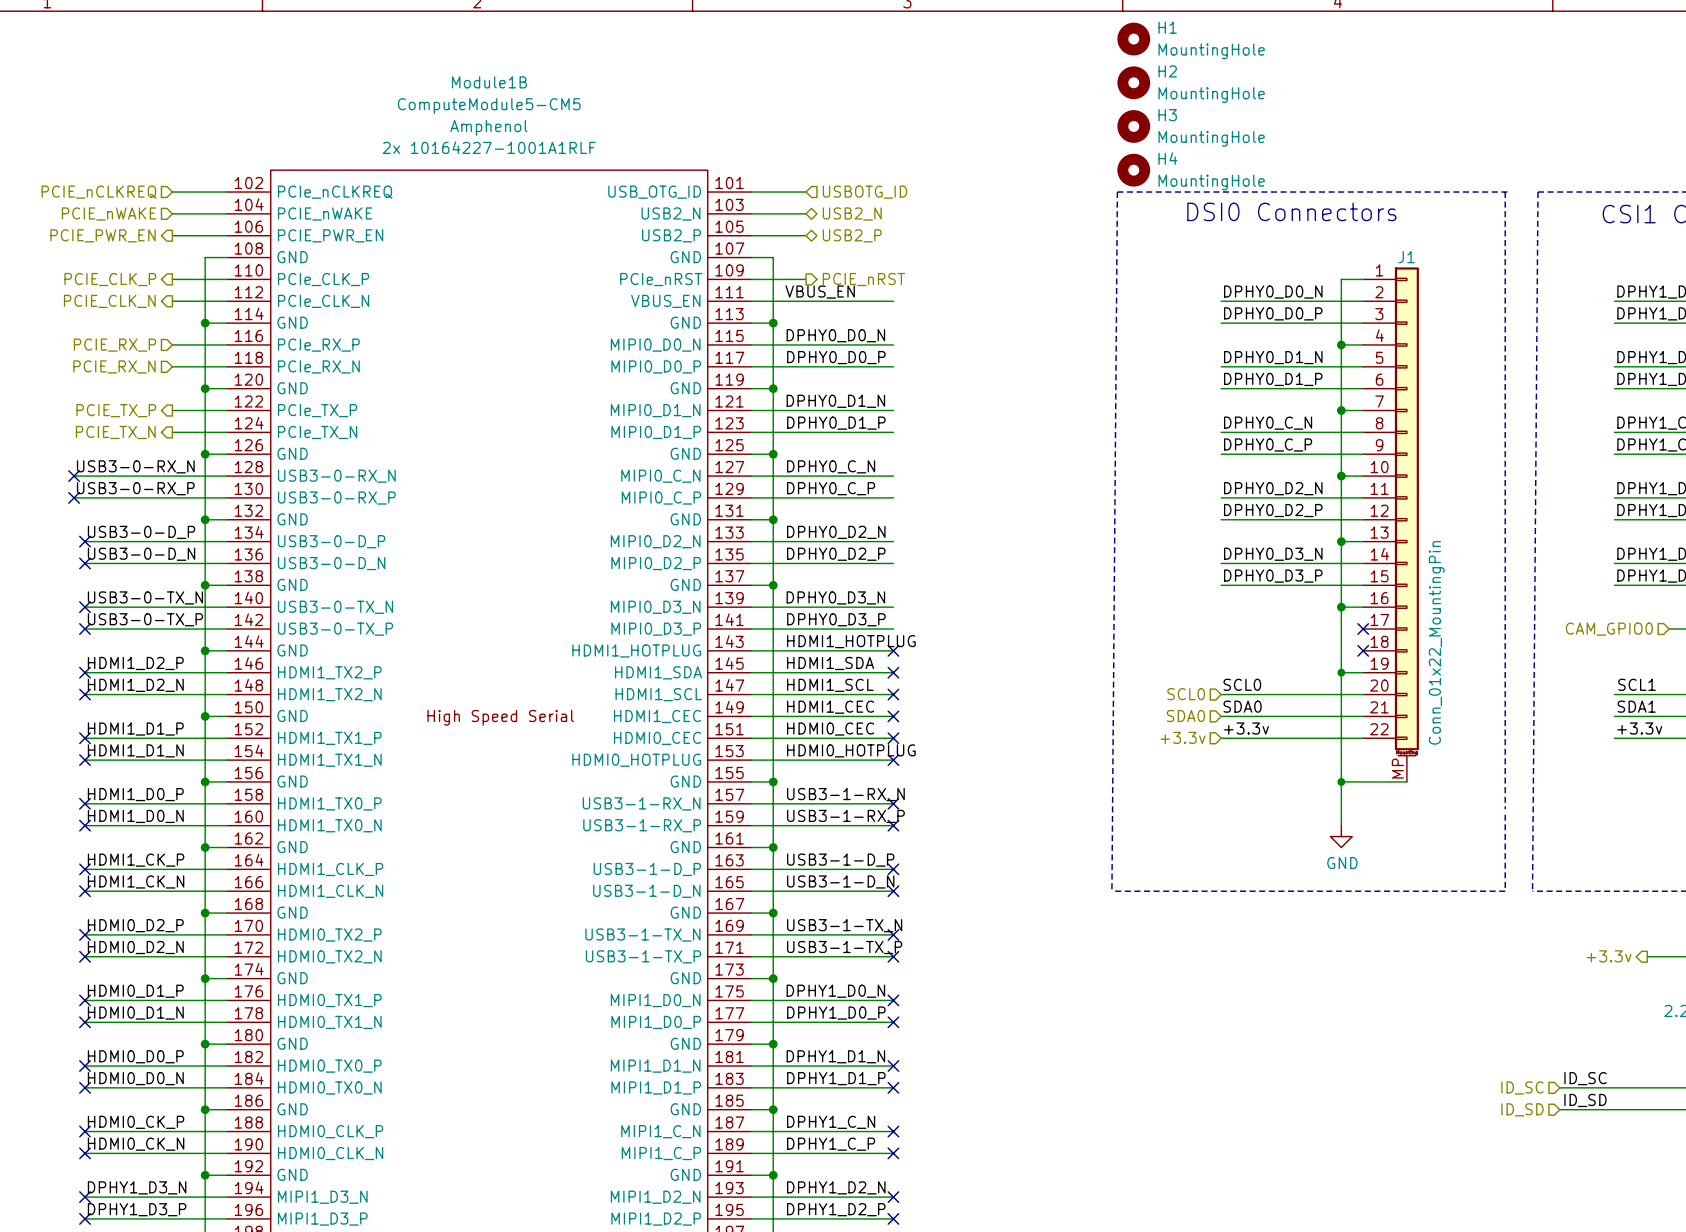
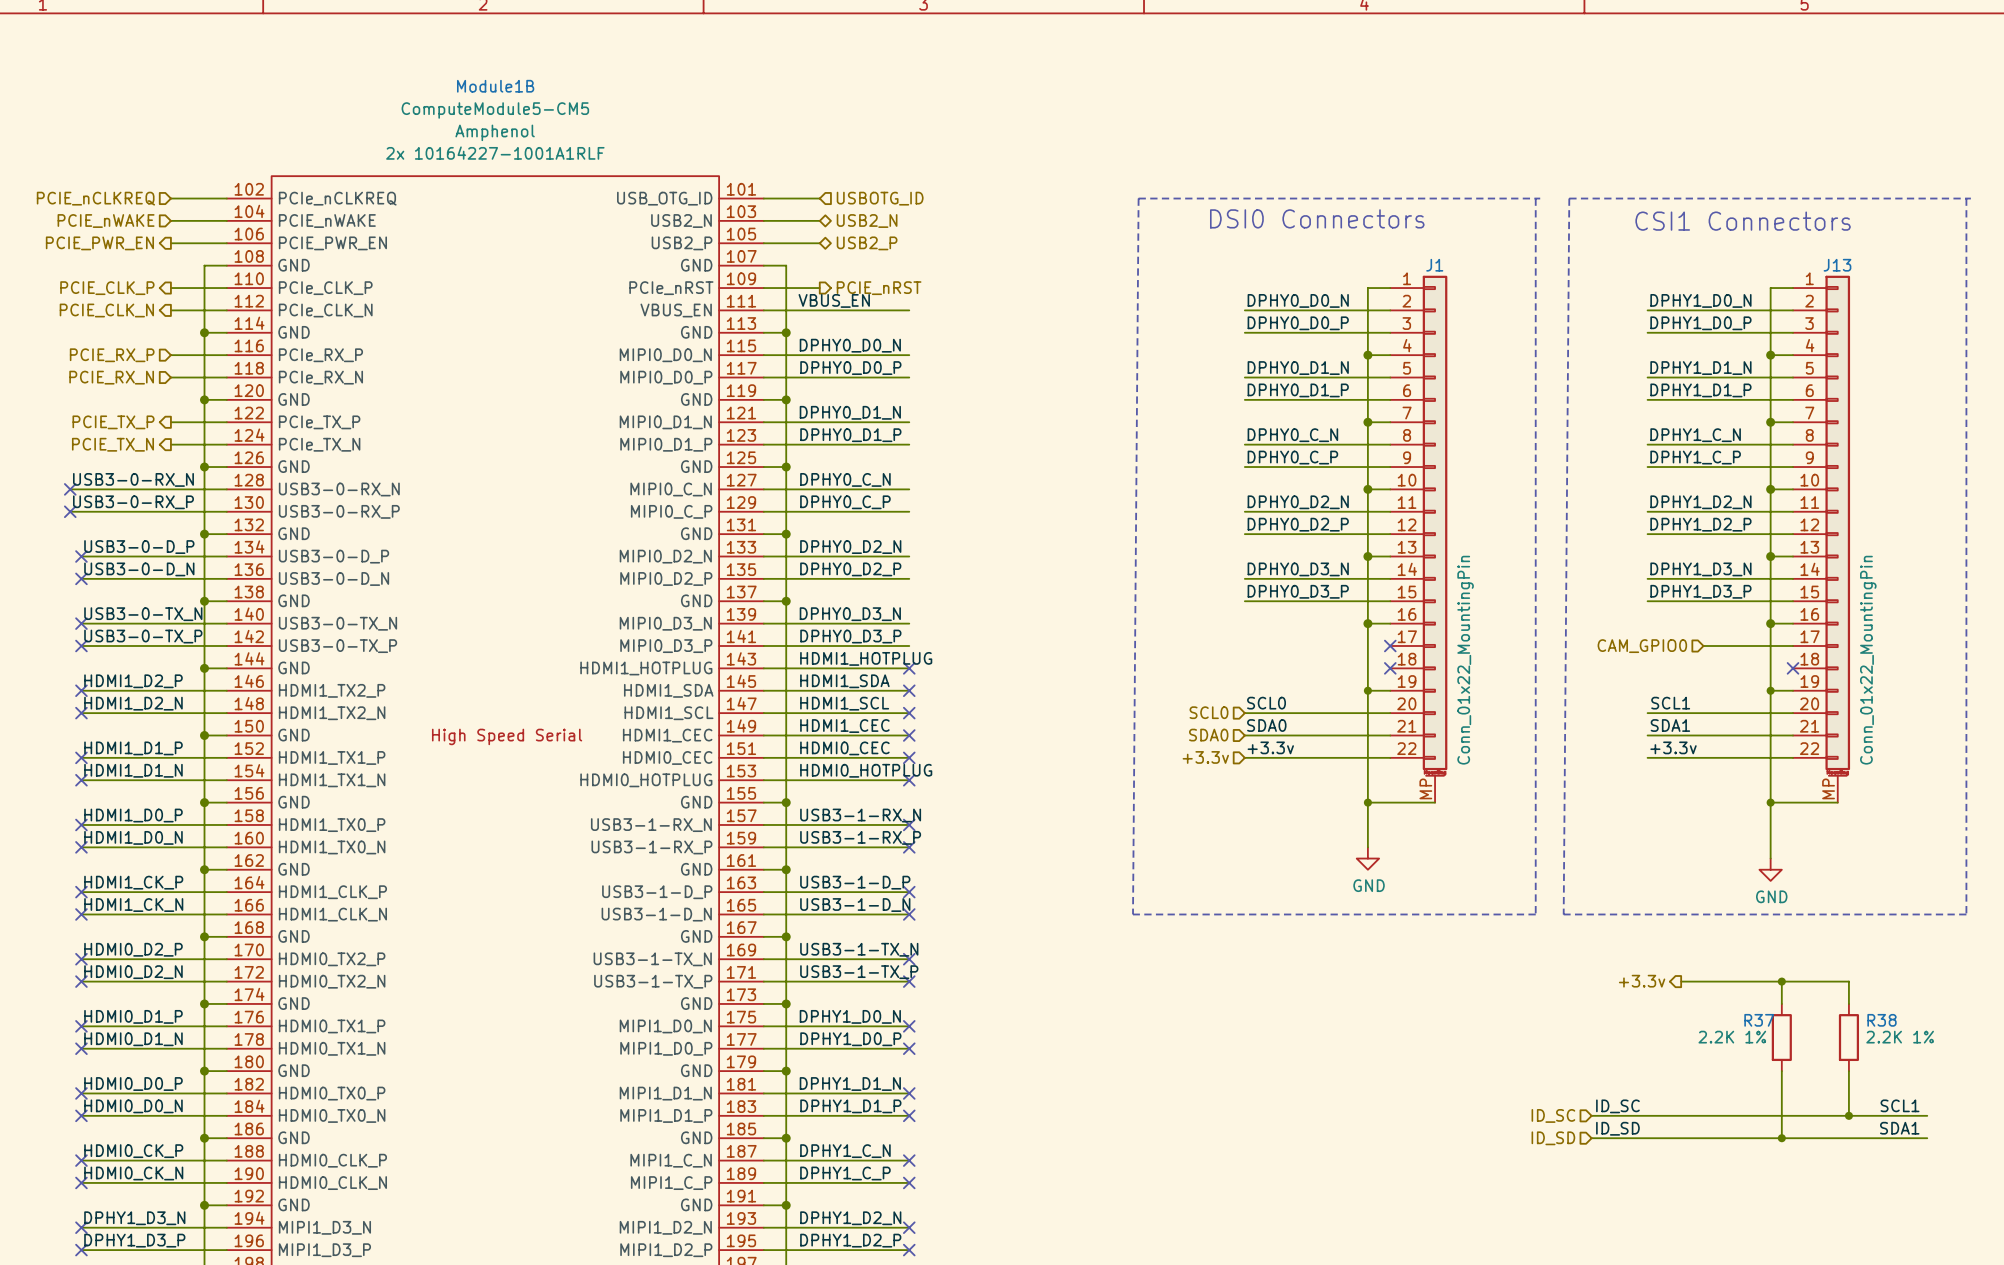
H1: MountingHole (1133, 39) -> none
H2: MountingHole (1133, 82) -> none
H3: MountingHole (1133, 126) -> none
H4: MountingHole (1133, 170) -> none

